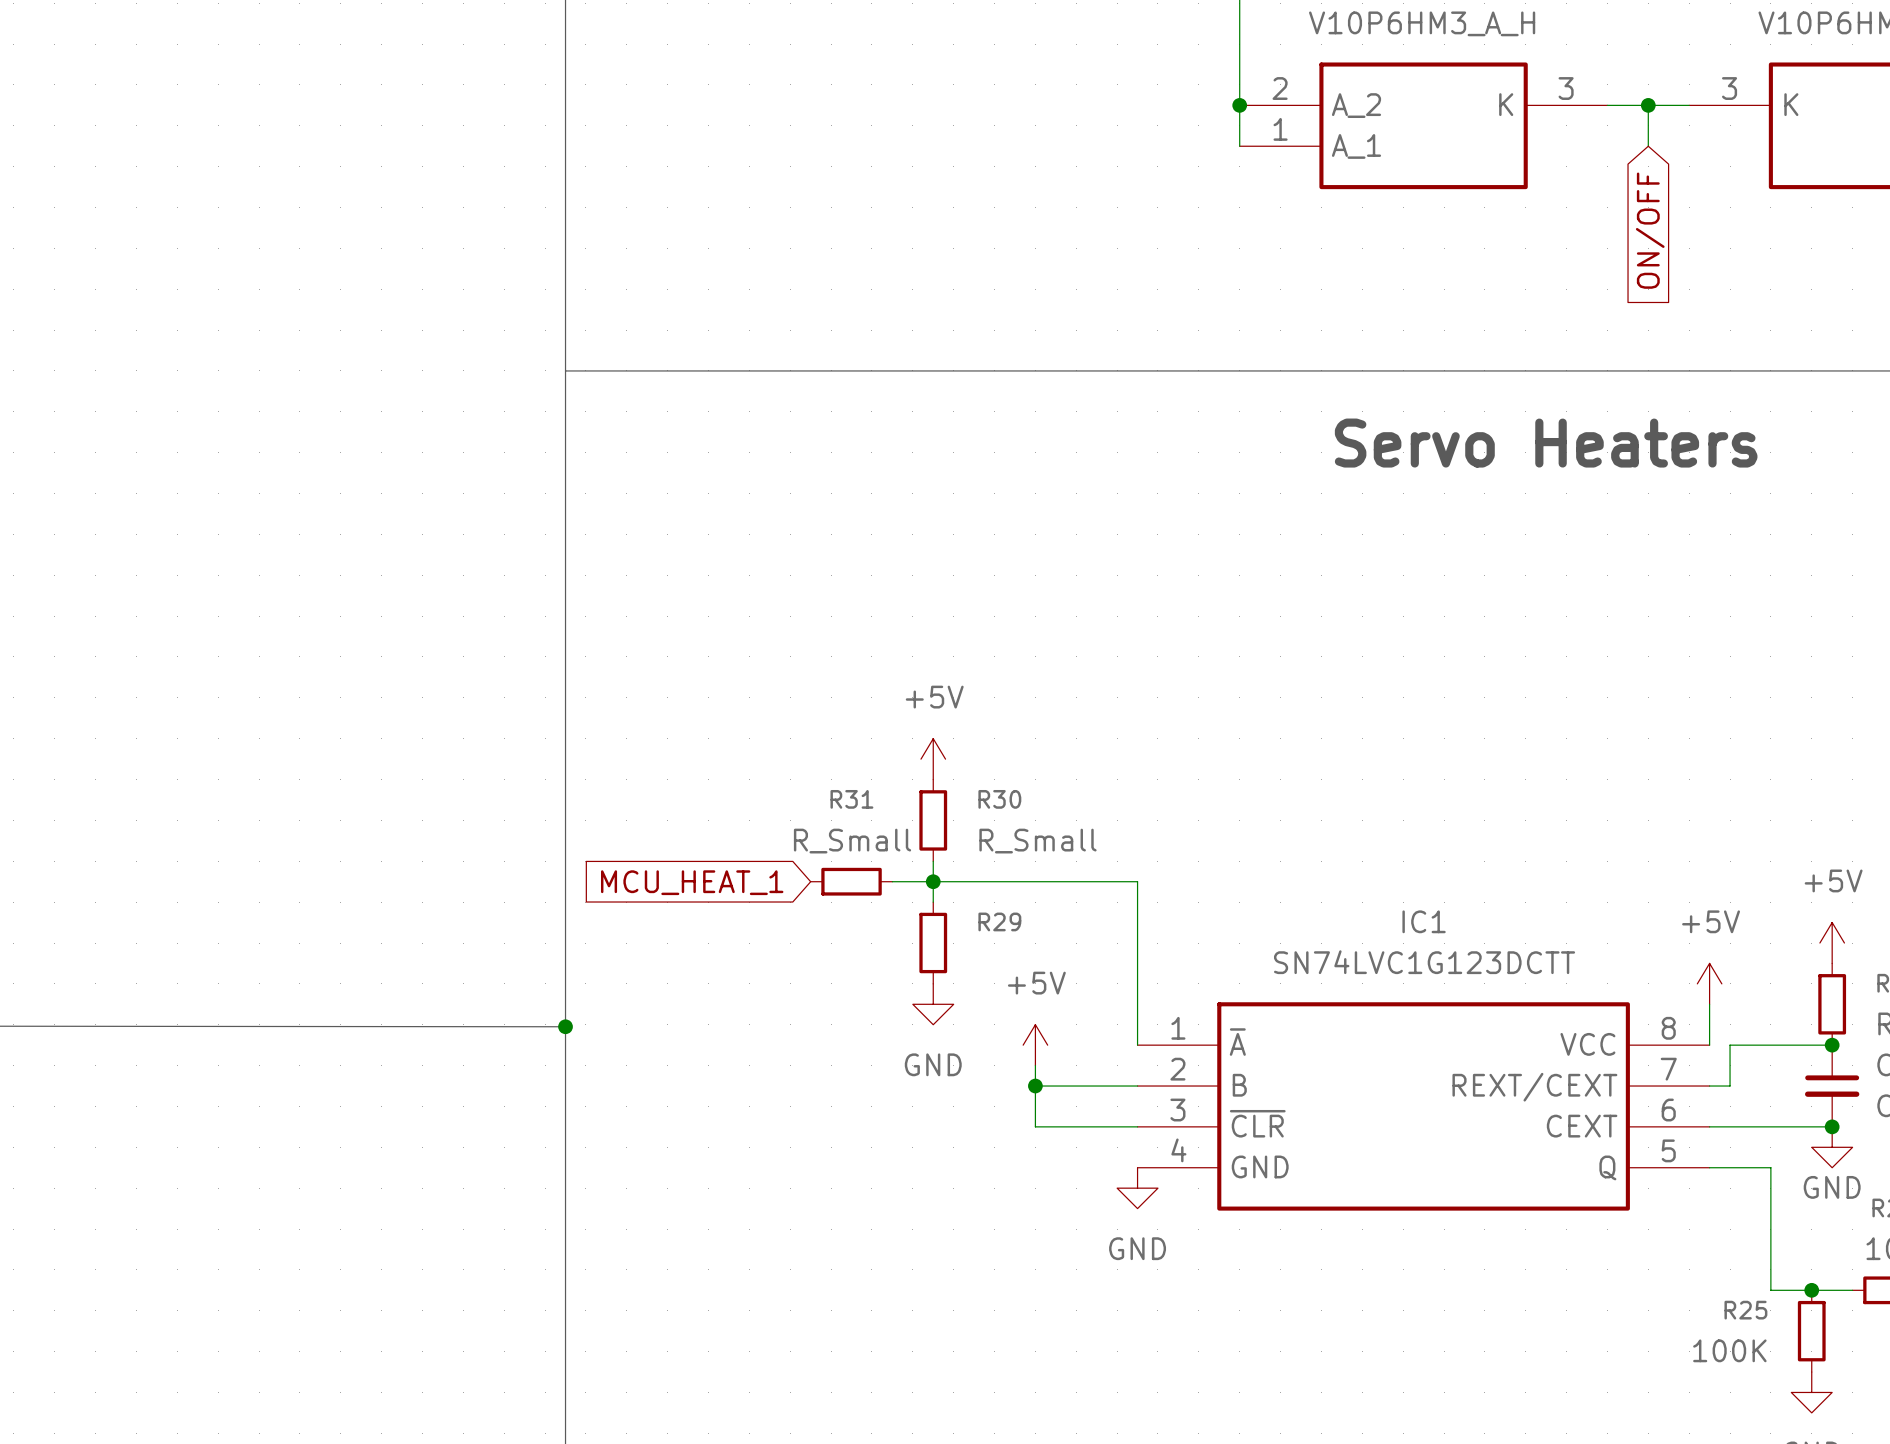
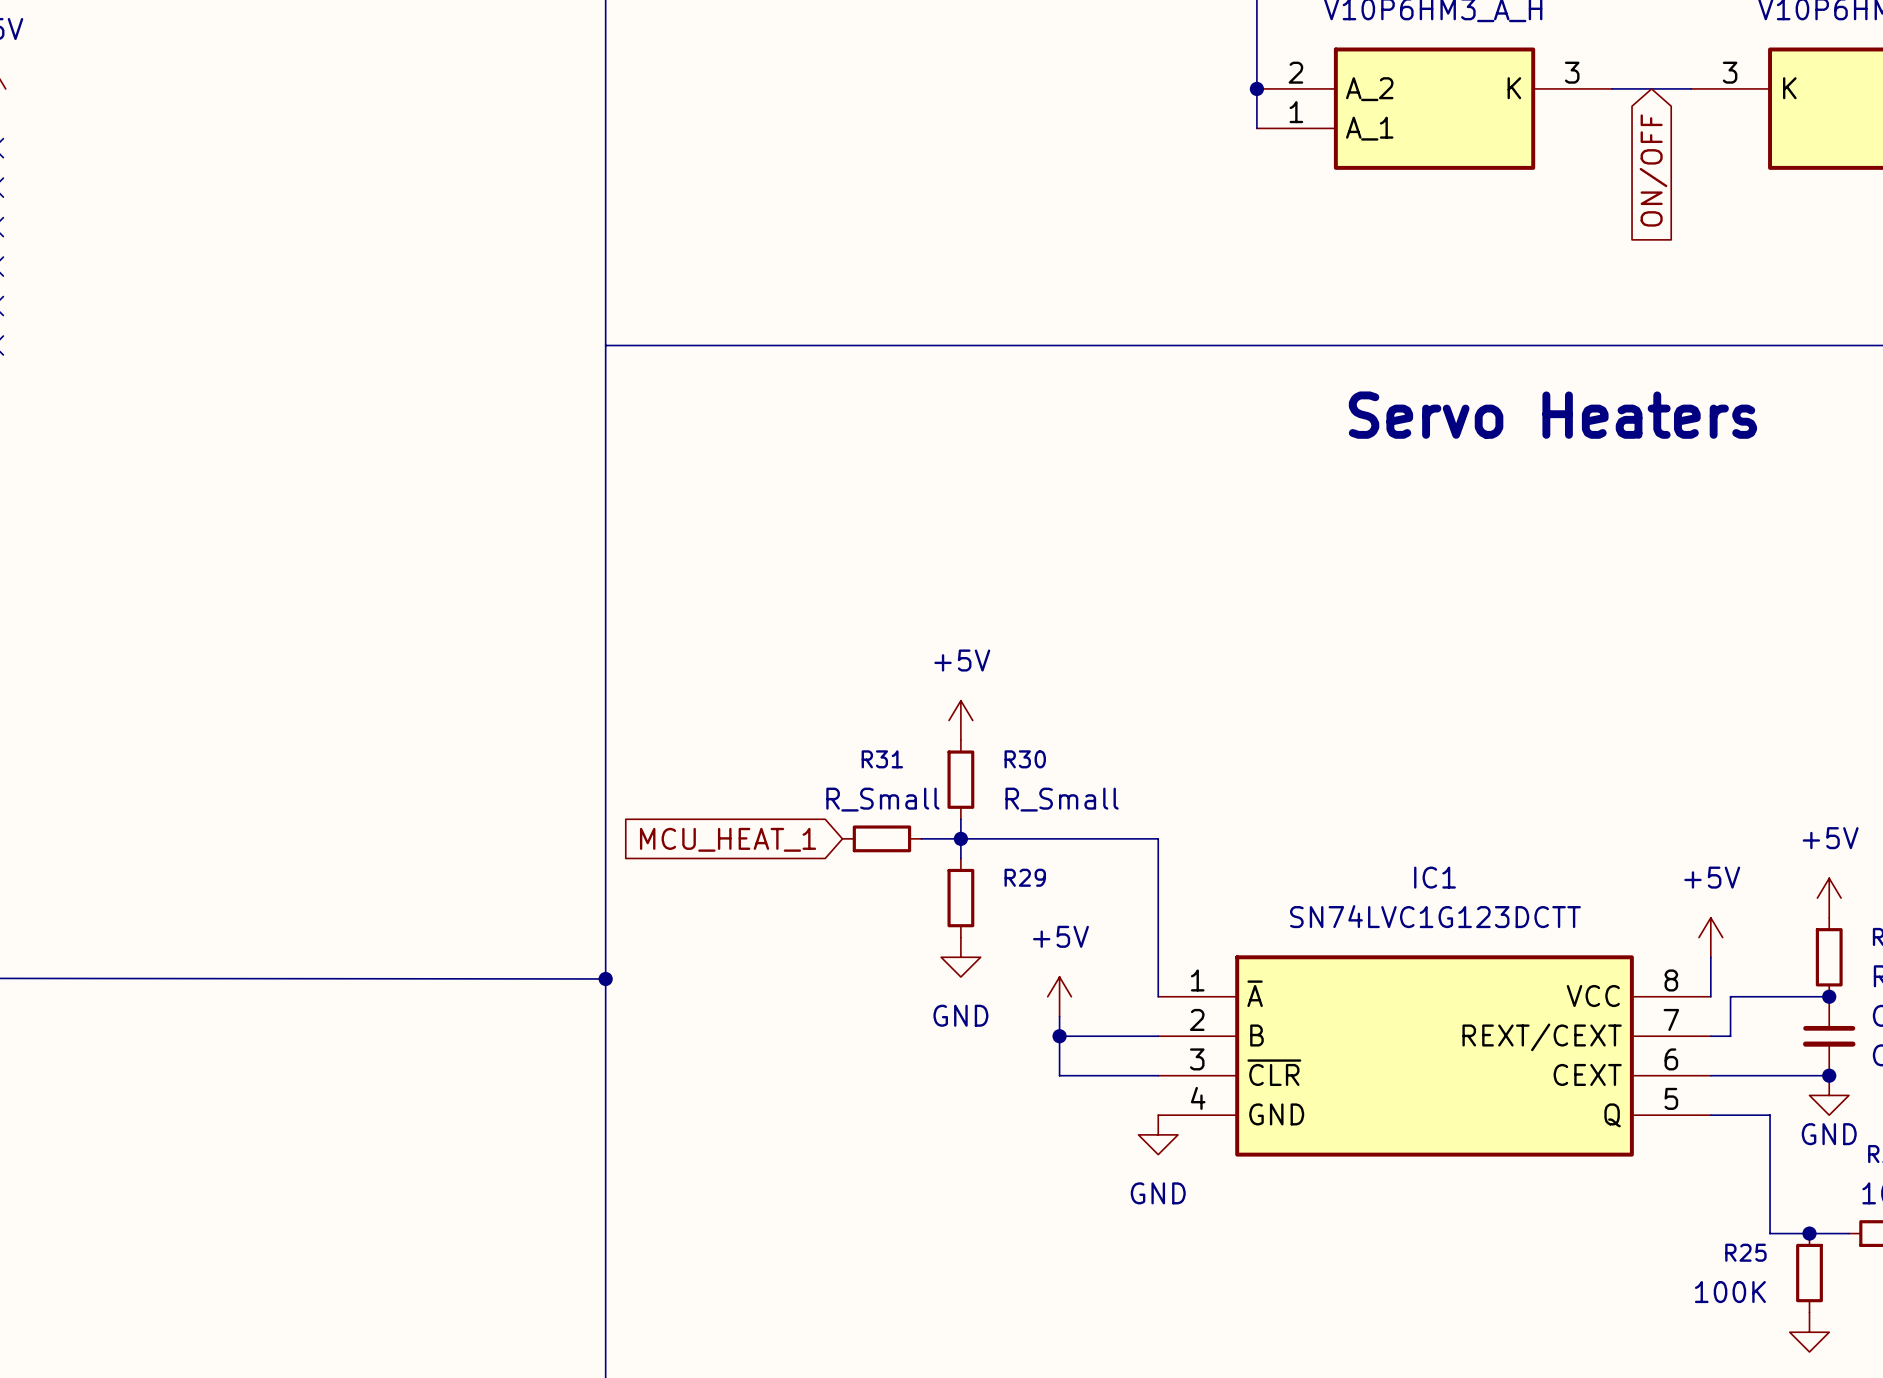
wire: (1648, 105) (1648, 146) -> none
junction: (1648, 105) -> none
global label position: ON/OFF (1650, 230) -> ON/OFF (1653, 170)

